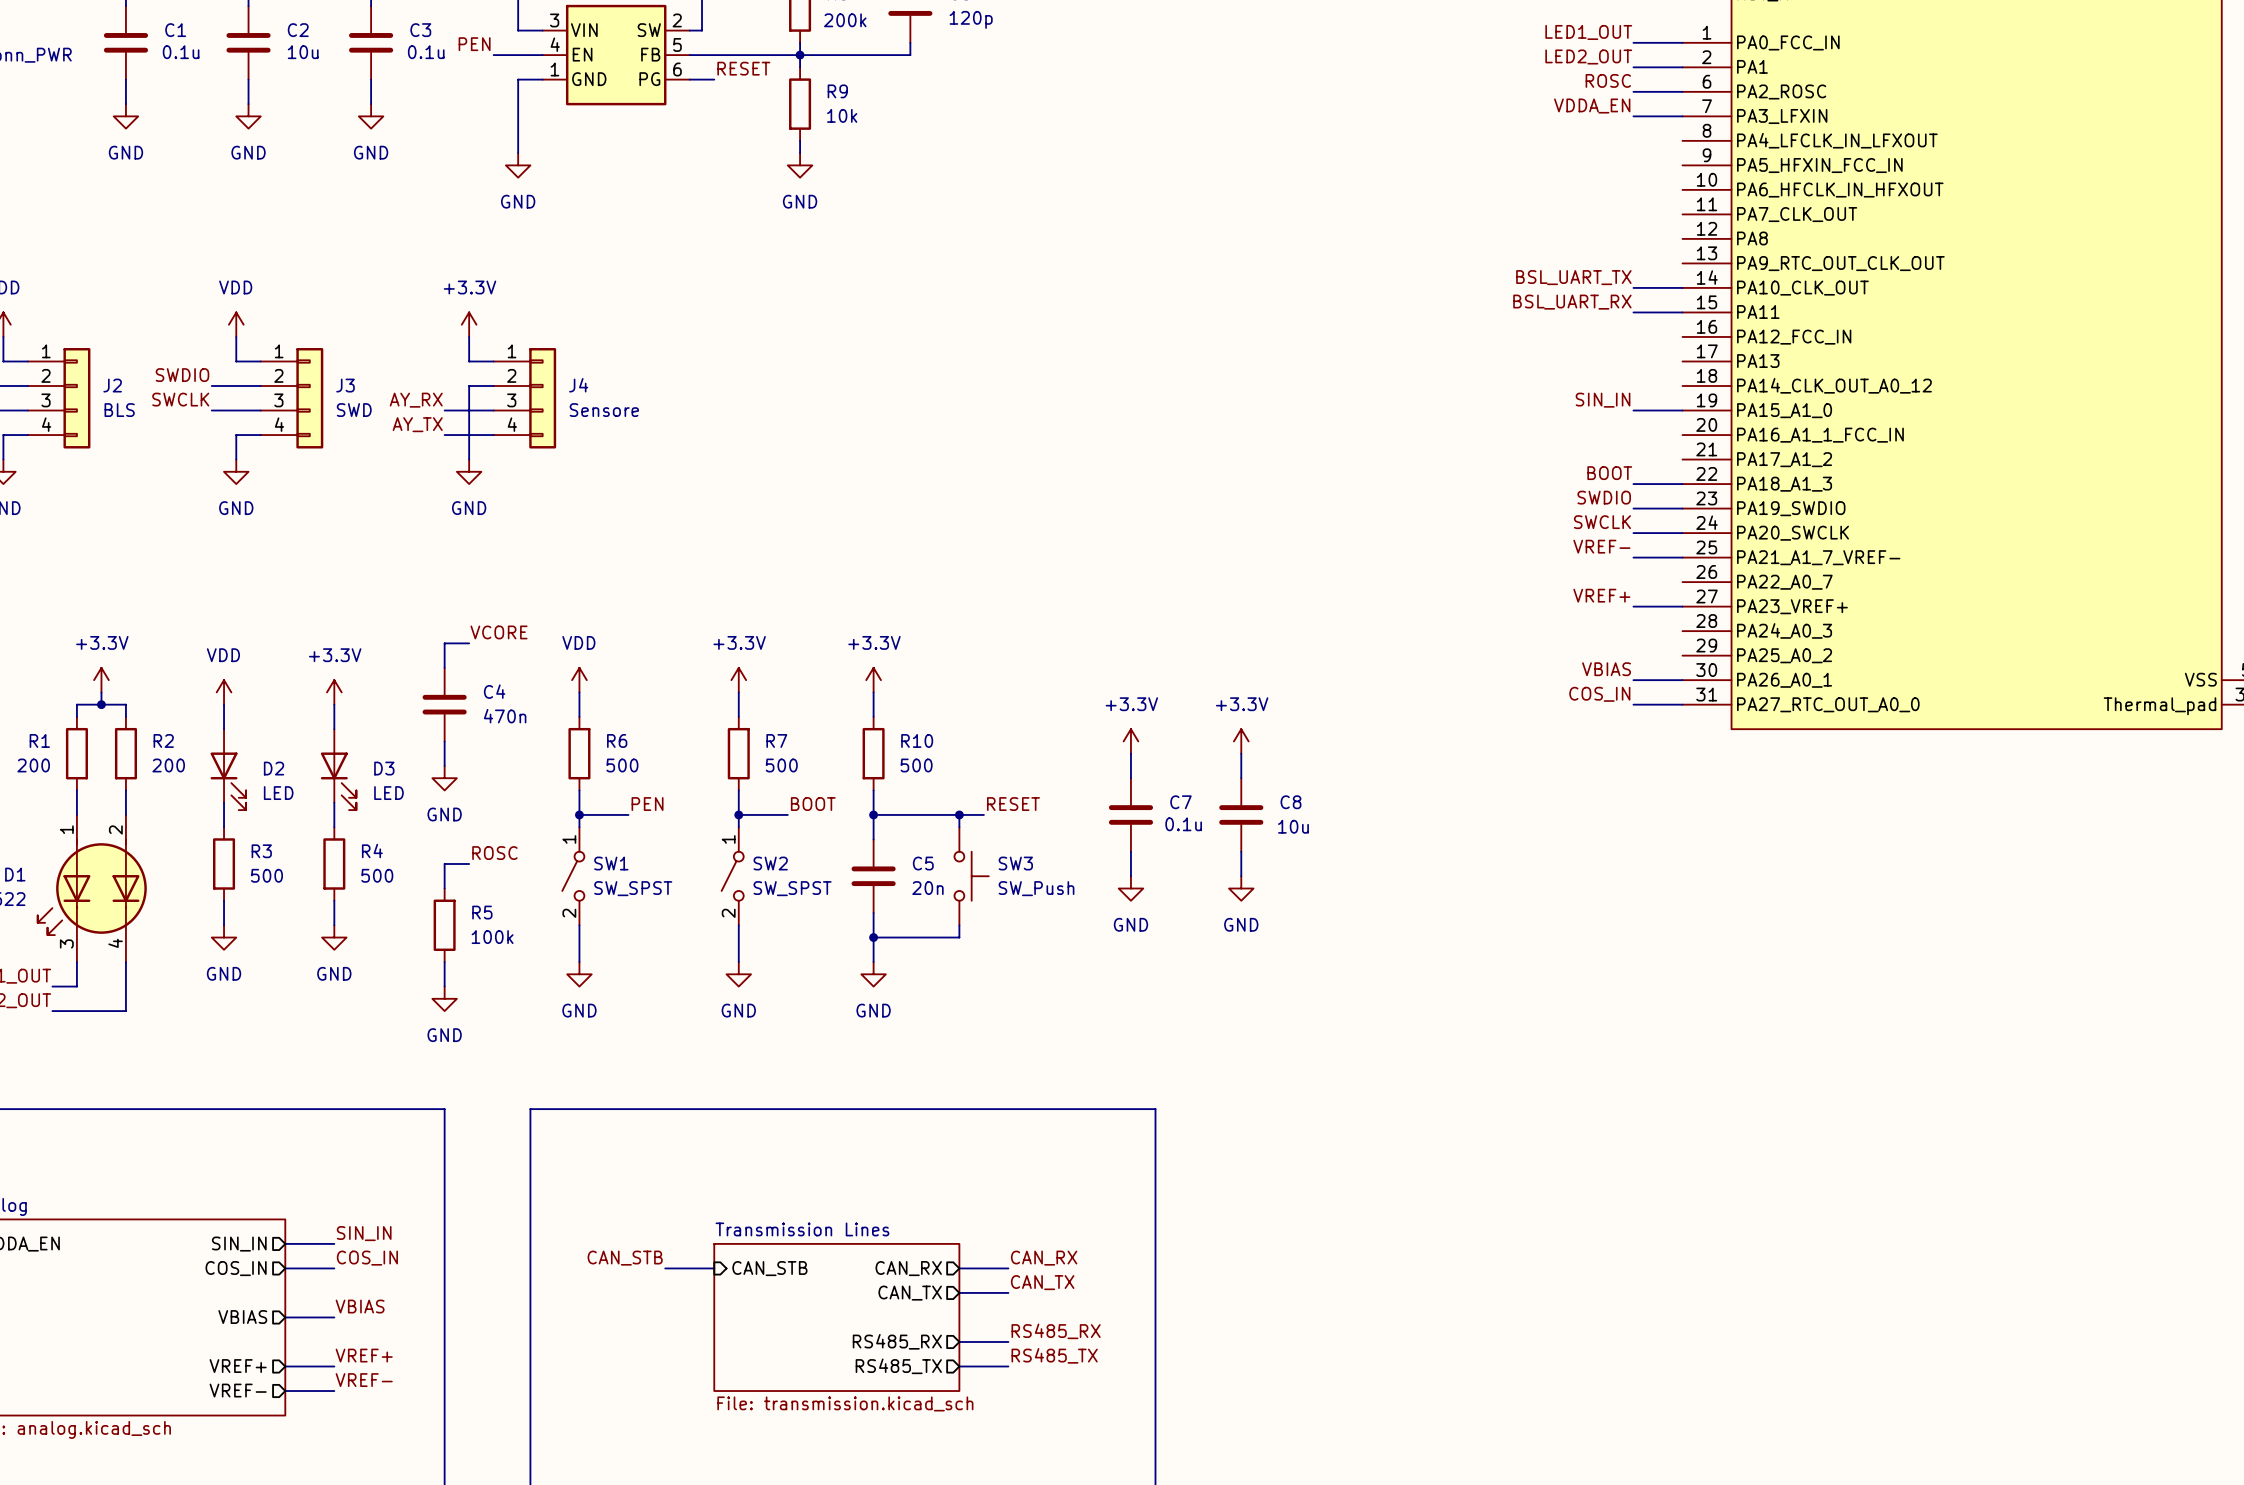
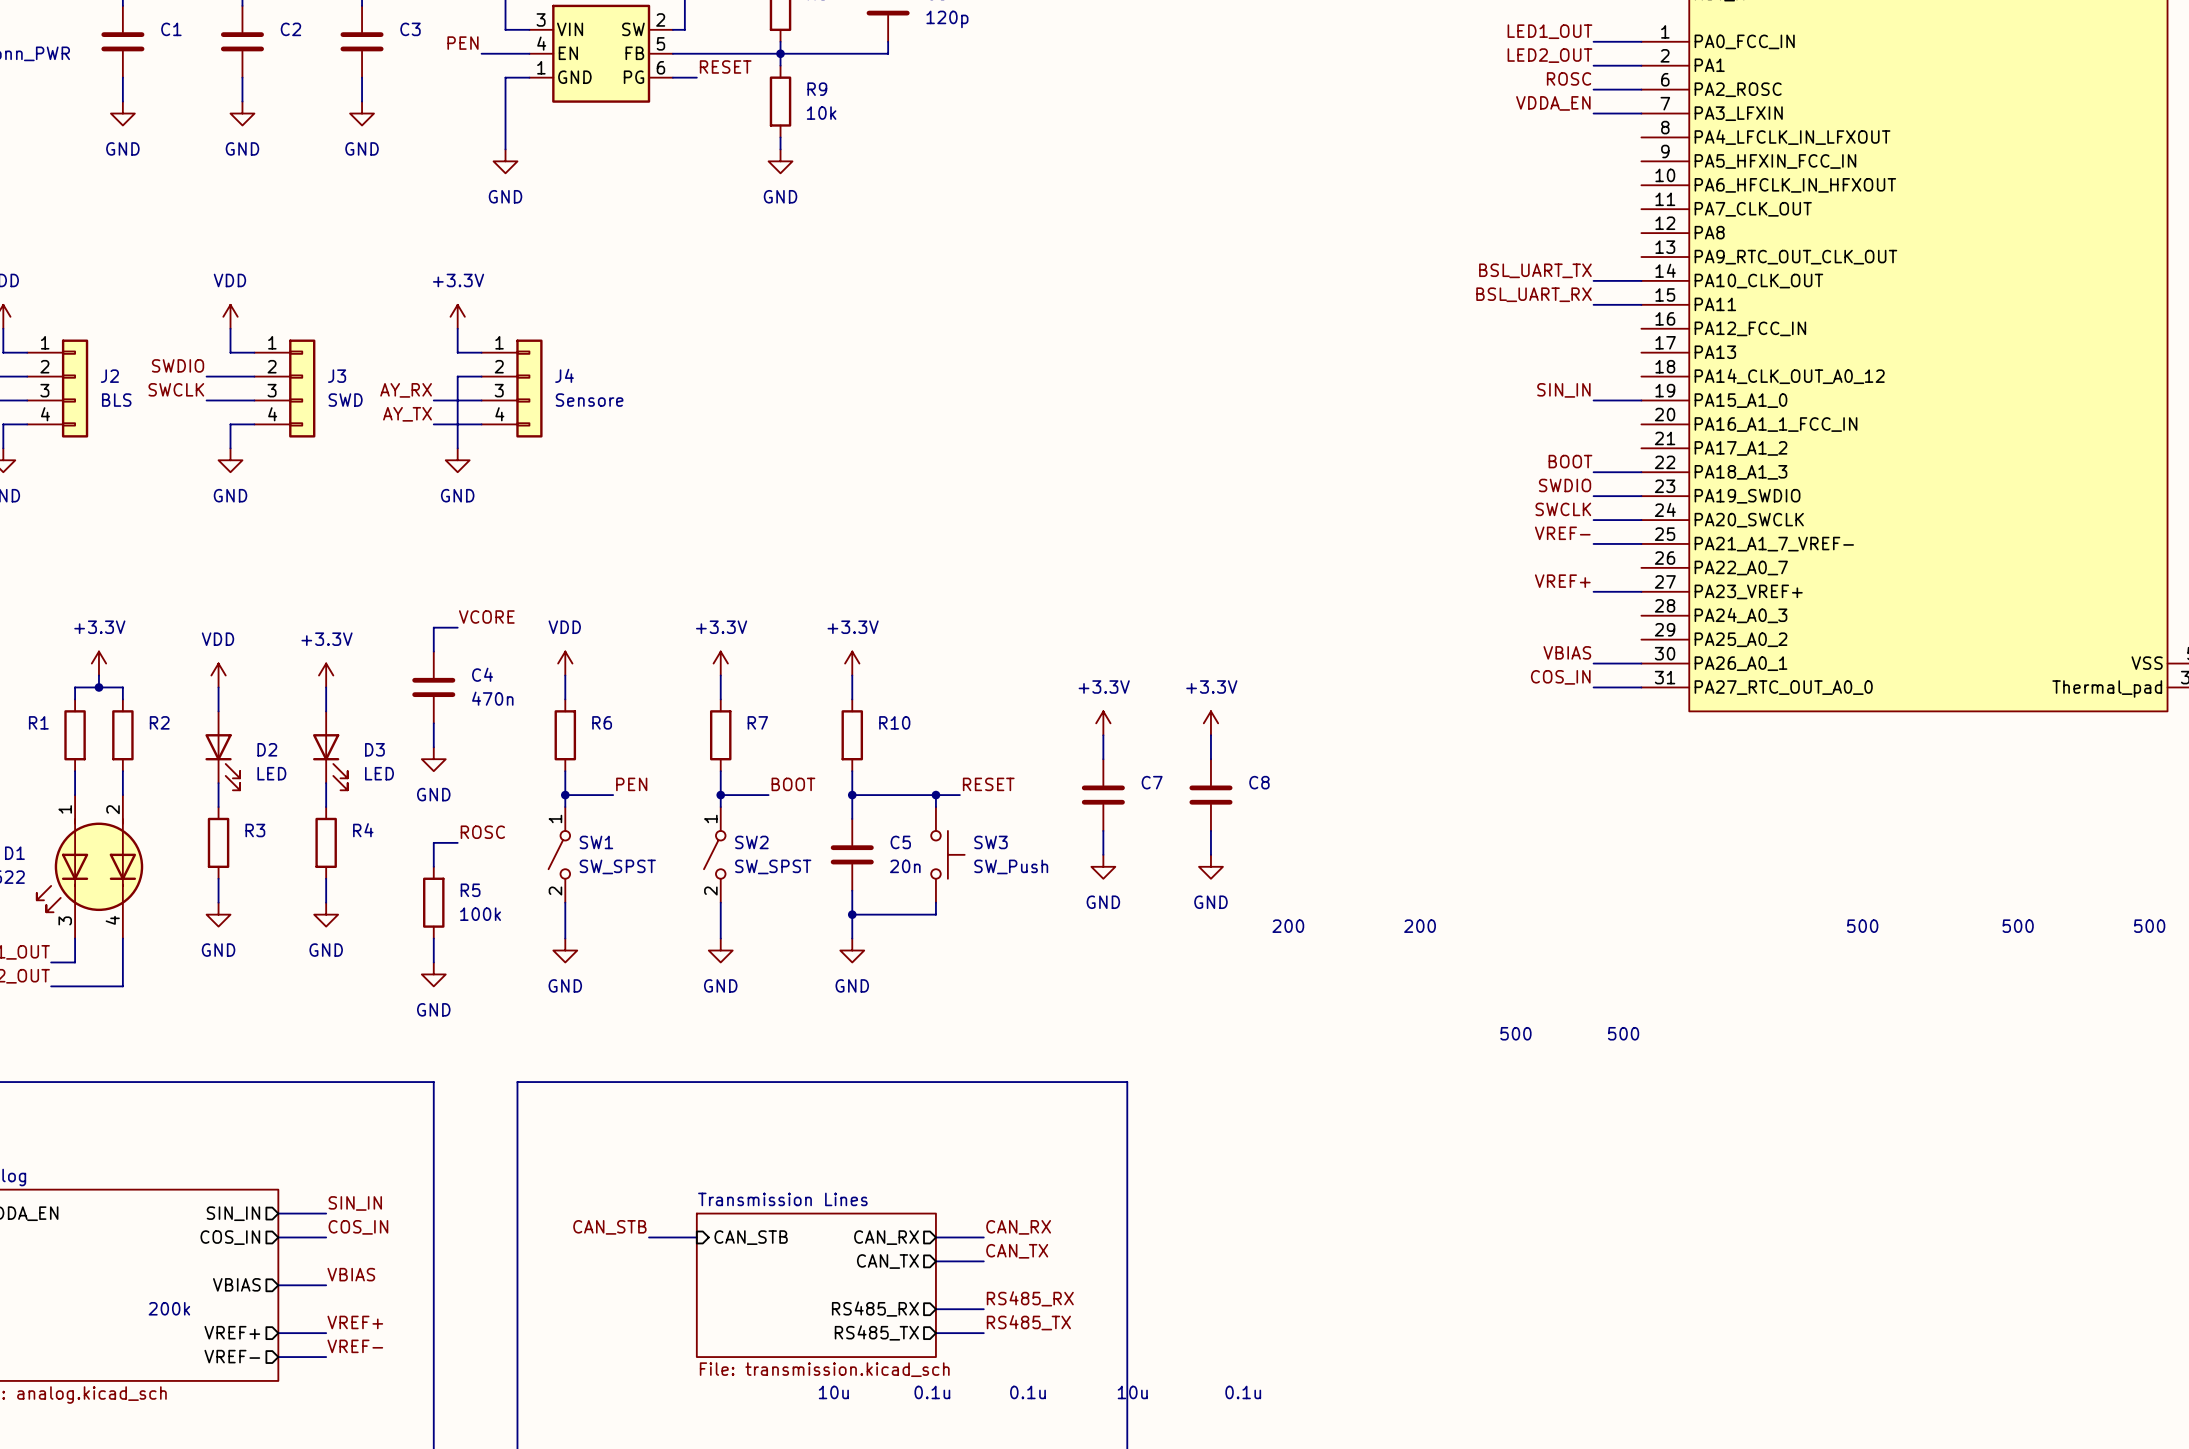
part value position: 200k (845, 20) -> 200k (169, 1308)
C1 value position: 0.1u (181, 52) -> 0.1u (932, 1392)
C2 value position: 10u (303, 52) -> 10u (833, 1392)
C3 value position: 0.1u (426, 52) -> 0.1u (1243, 1392)
R1 value position: 200 (33, 765) -> 200 (1288, 926)
R2 value position: 200 (168, 765) -> 200 (1420, 926)
R6 value position: 500 (622, 765) -> 500 (1862, 926)
R7 value position: 500 (781, 765) -> 500 (2018, 926)
R10 value position: 500 (916, 765) -> 500 (2149, 926)
C7 value position: 0.1u (1183, 824) -> 0.1u (1028, 1392)
C8 value position: 10u (1293, 826) -> 10u (1132, 1392)
R3 value position: 500 (267, 875) -> 500 (1515, 1033)
R4 value position: 500 (377, 875) -> 500 (1623, 1033)

